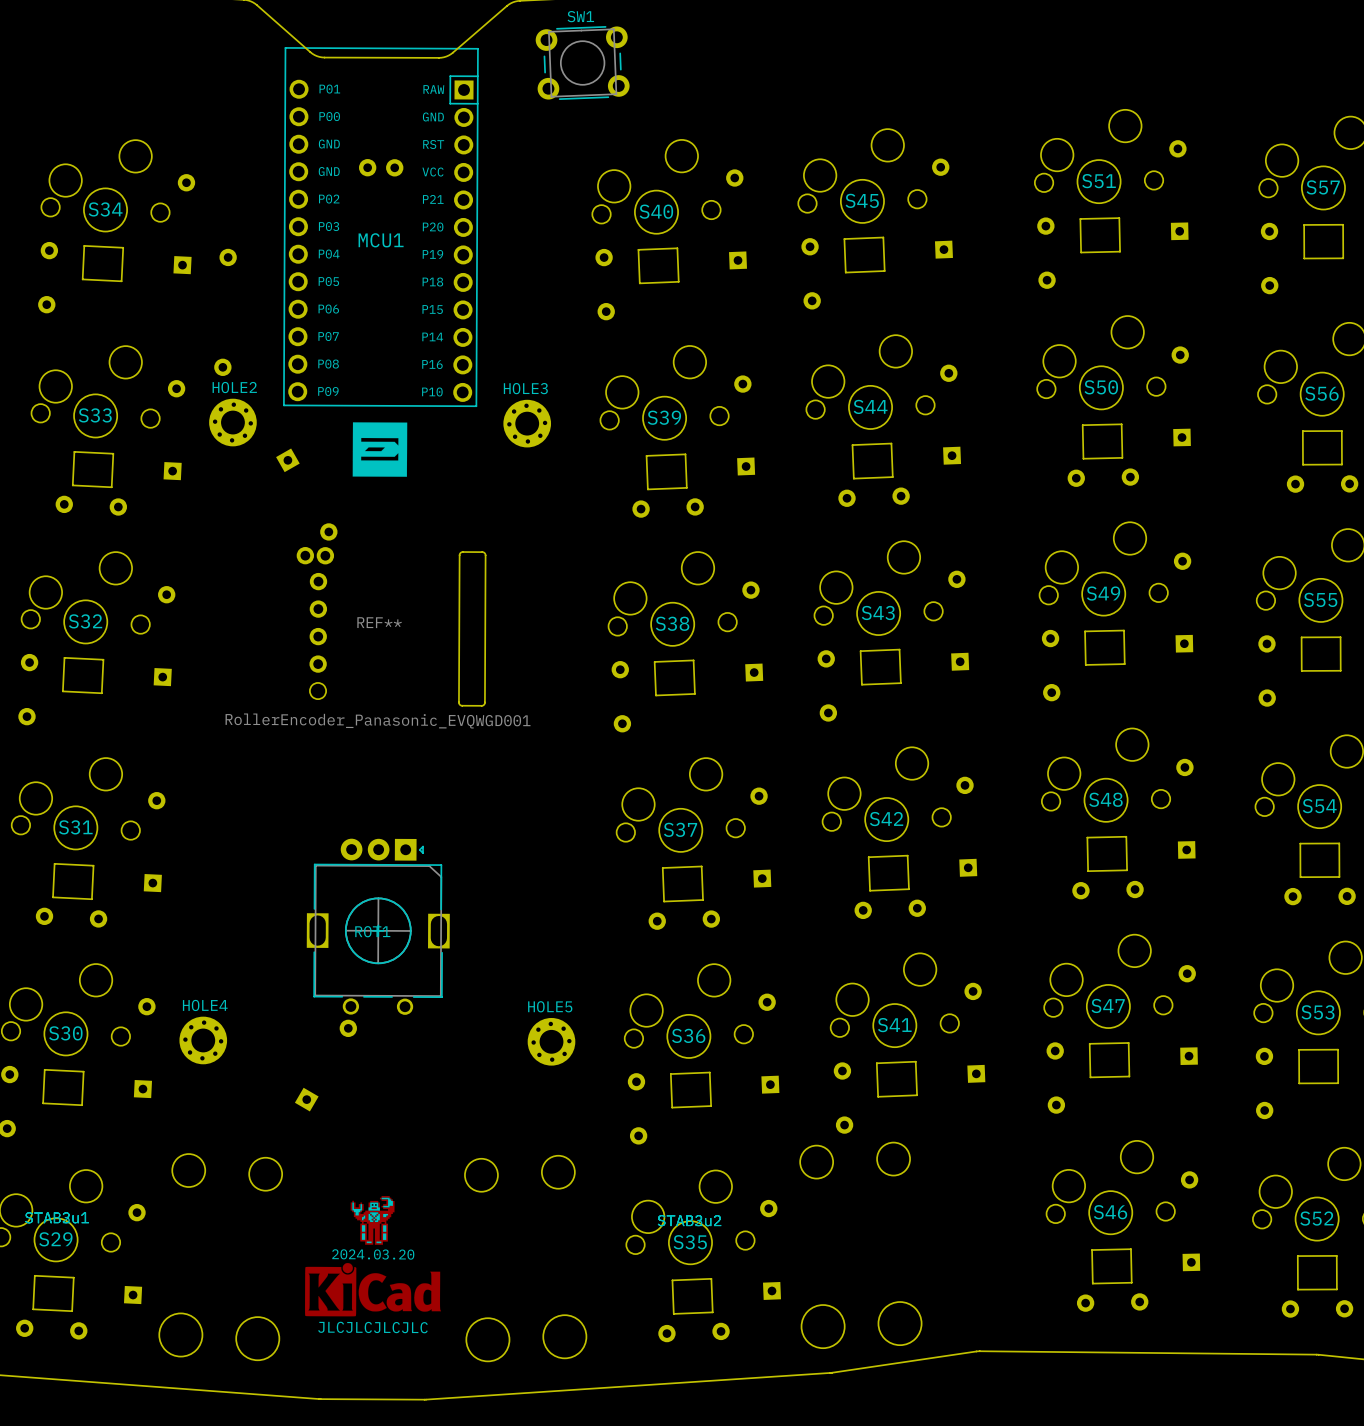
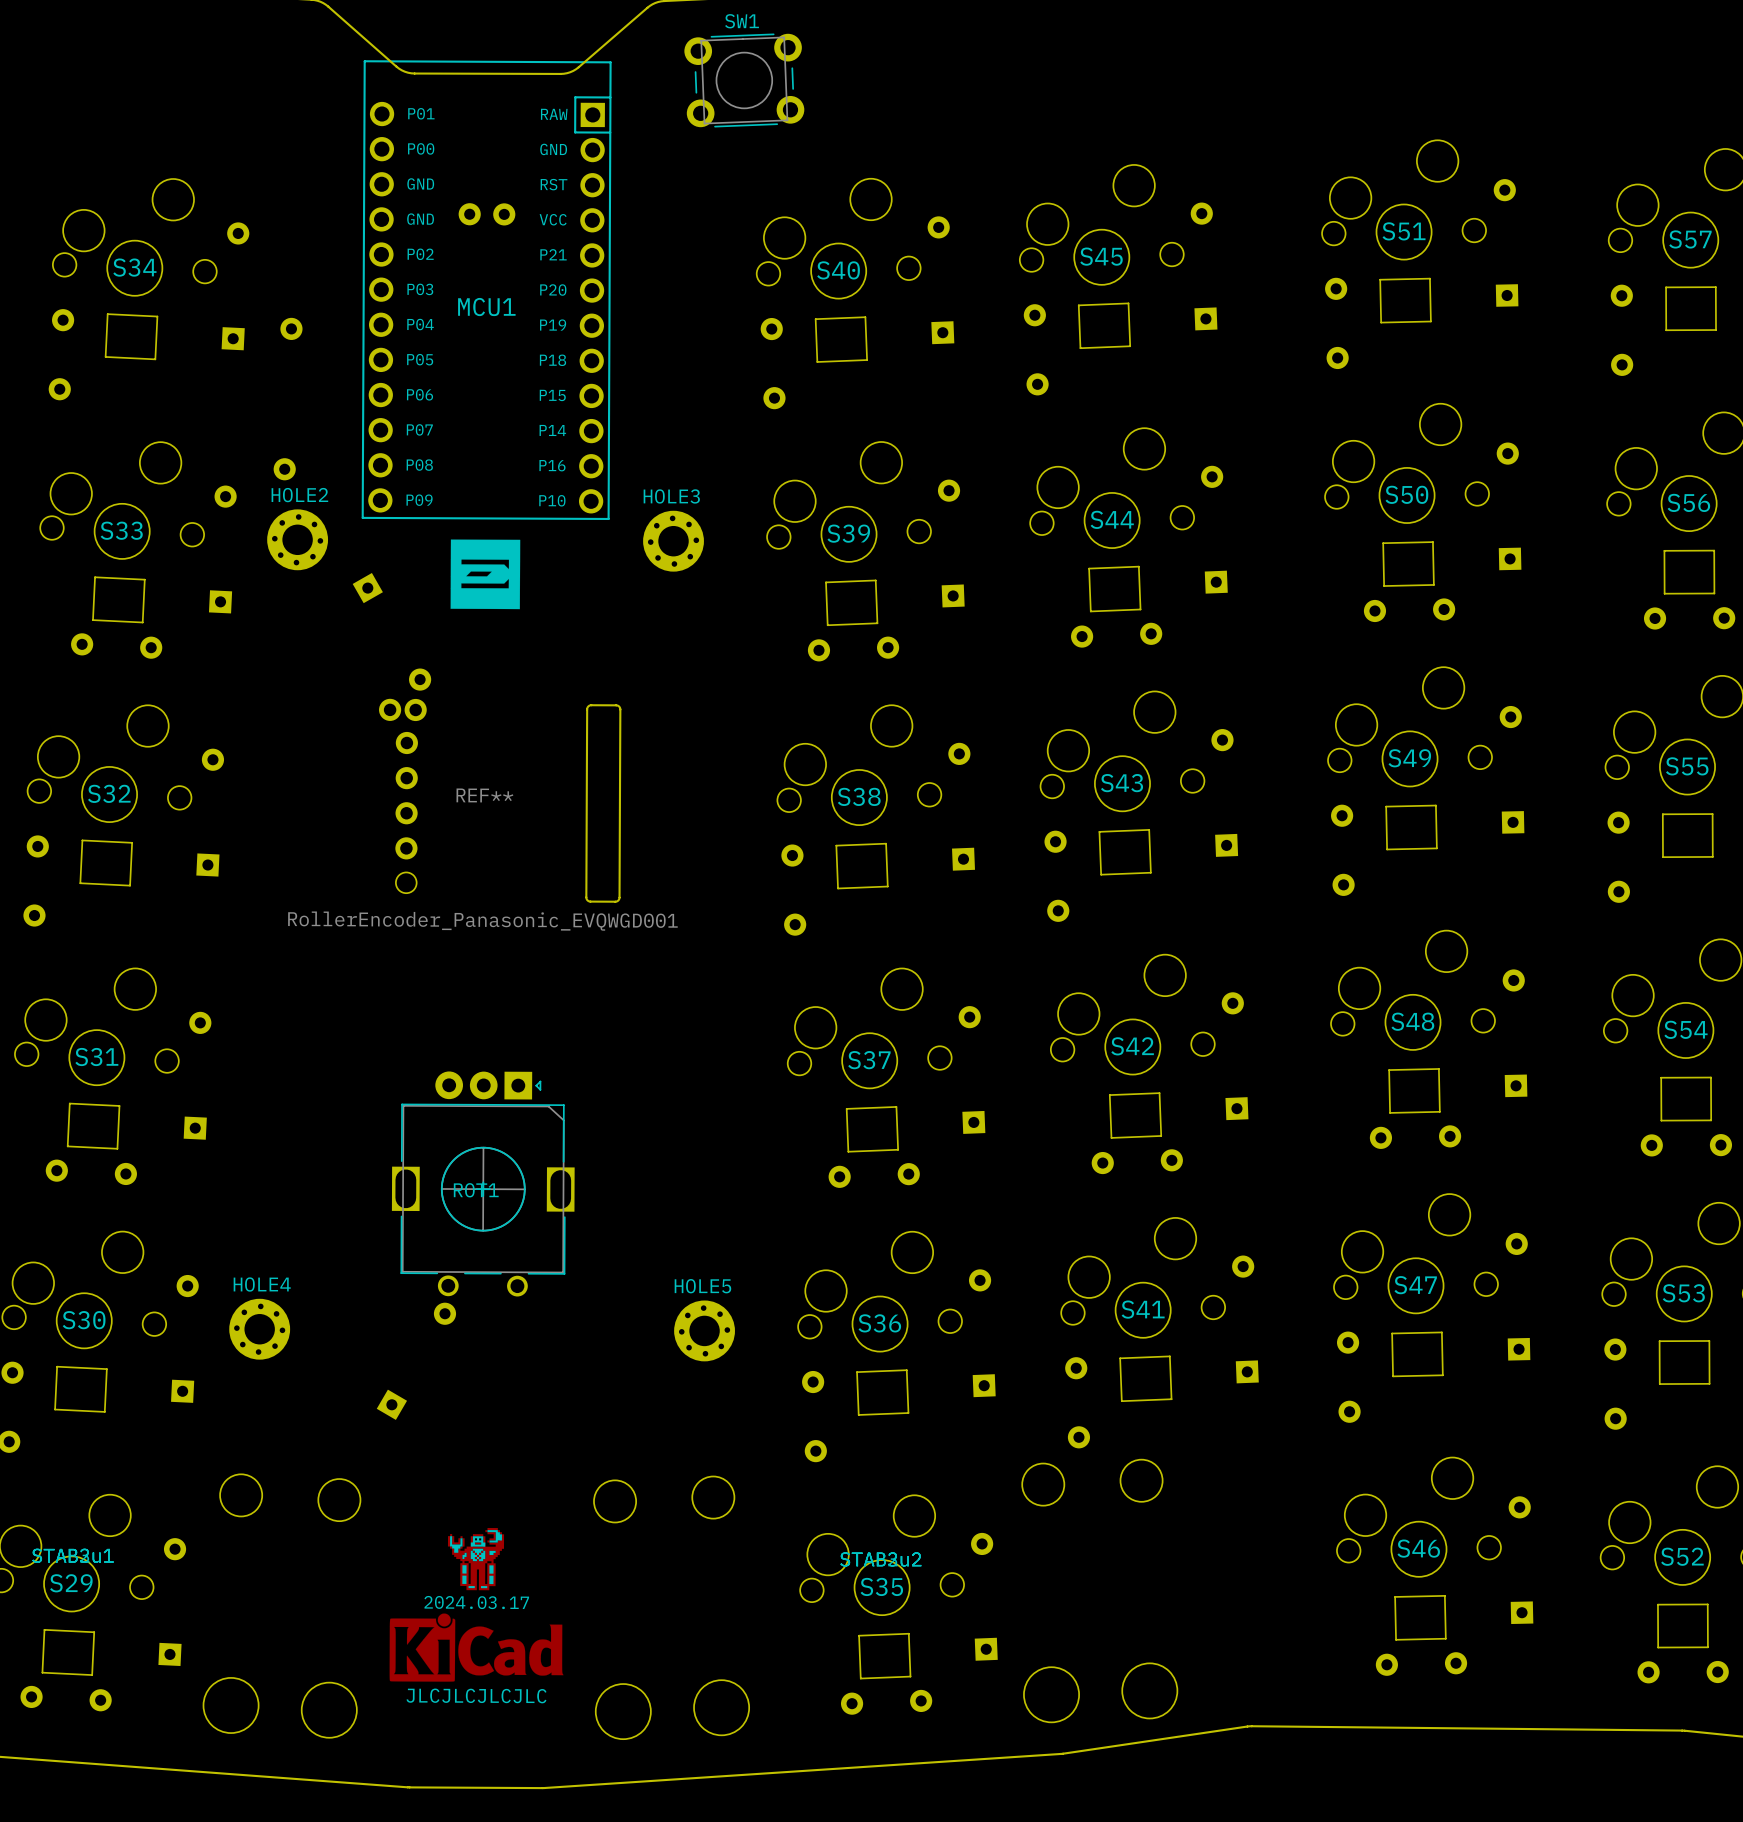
text: 2024.03.20 (373, 1254) -> 2024.03.17 (476, 1602)

